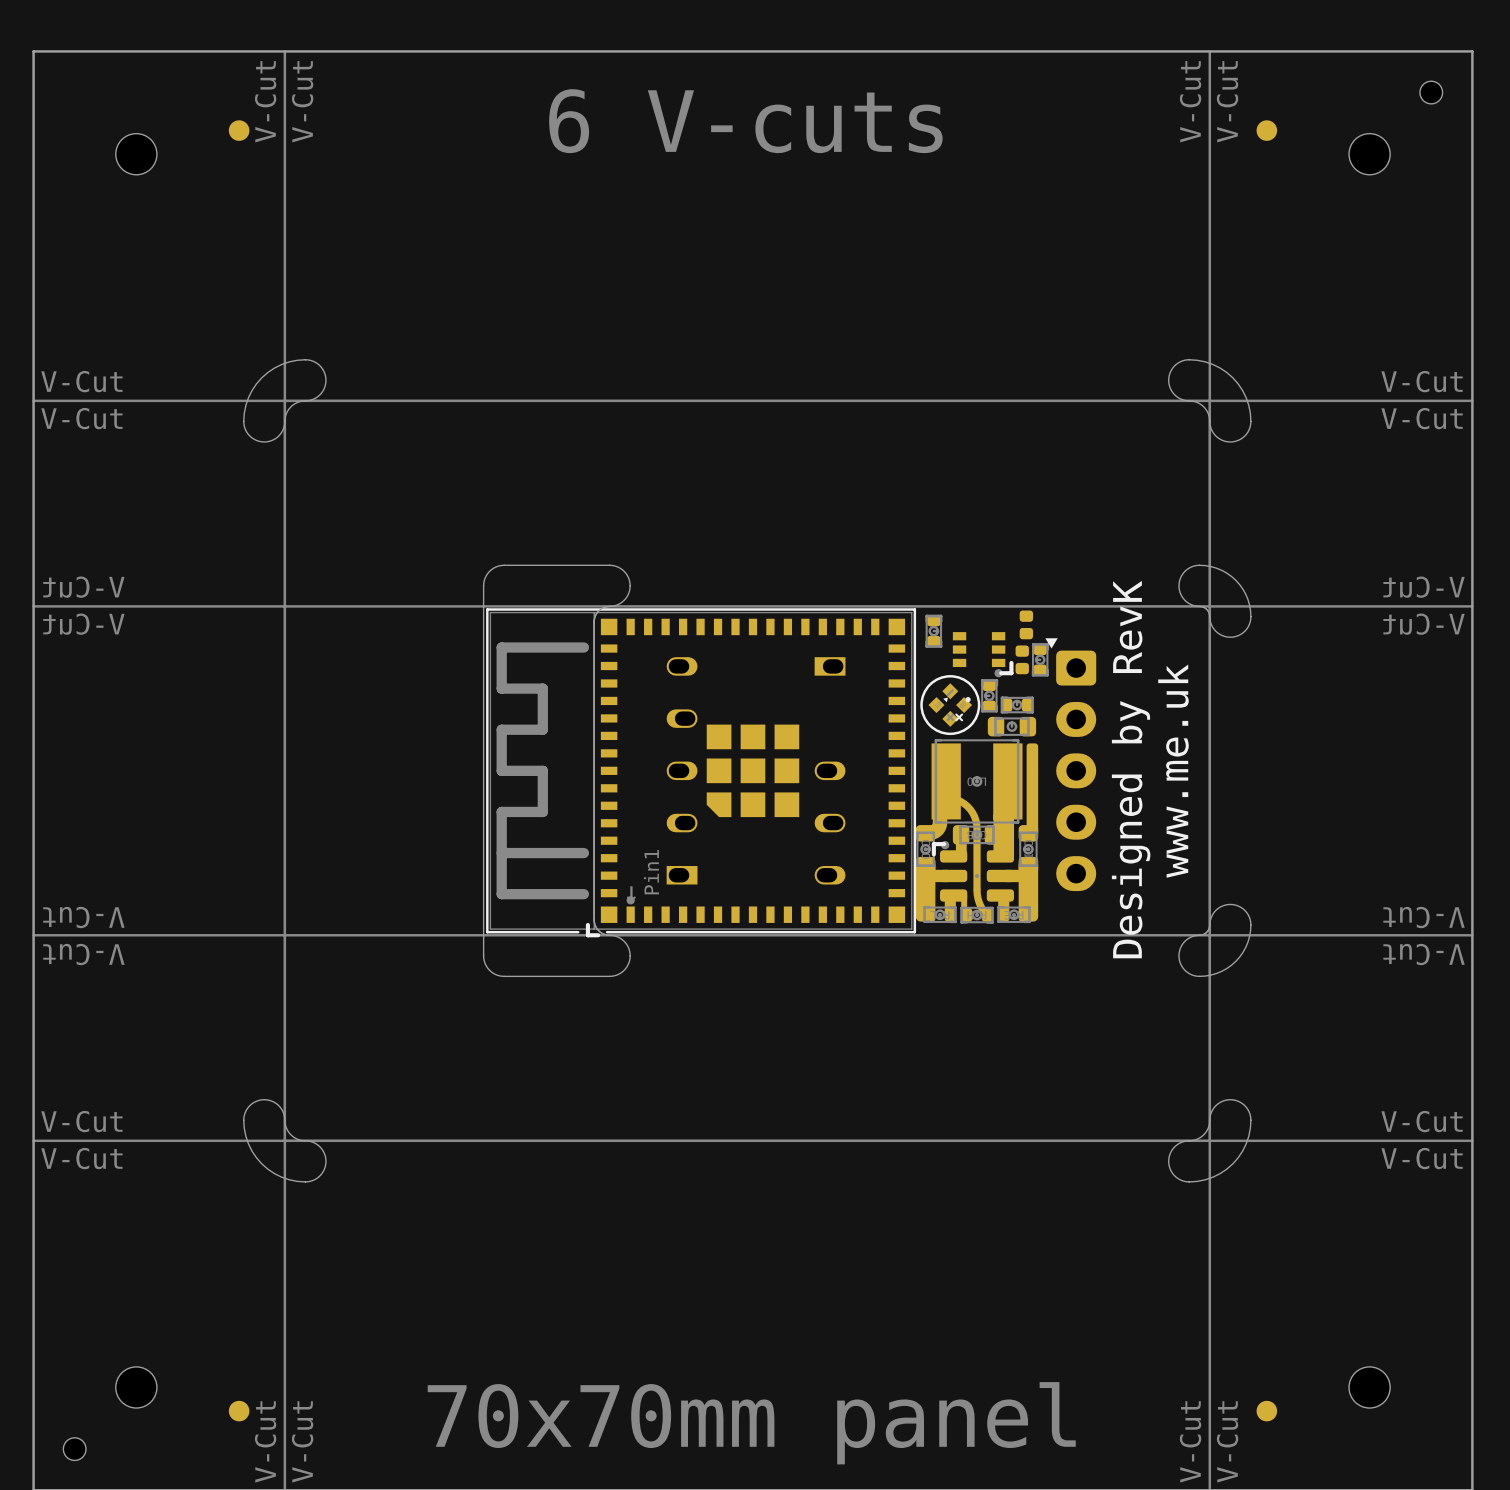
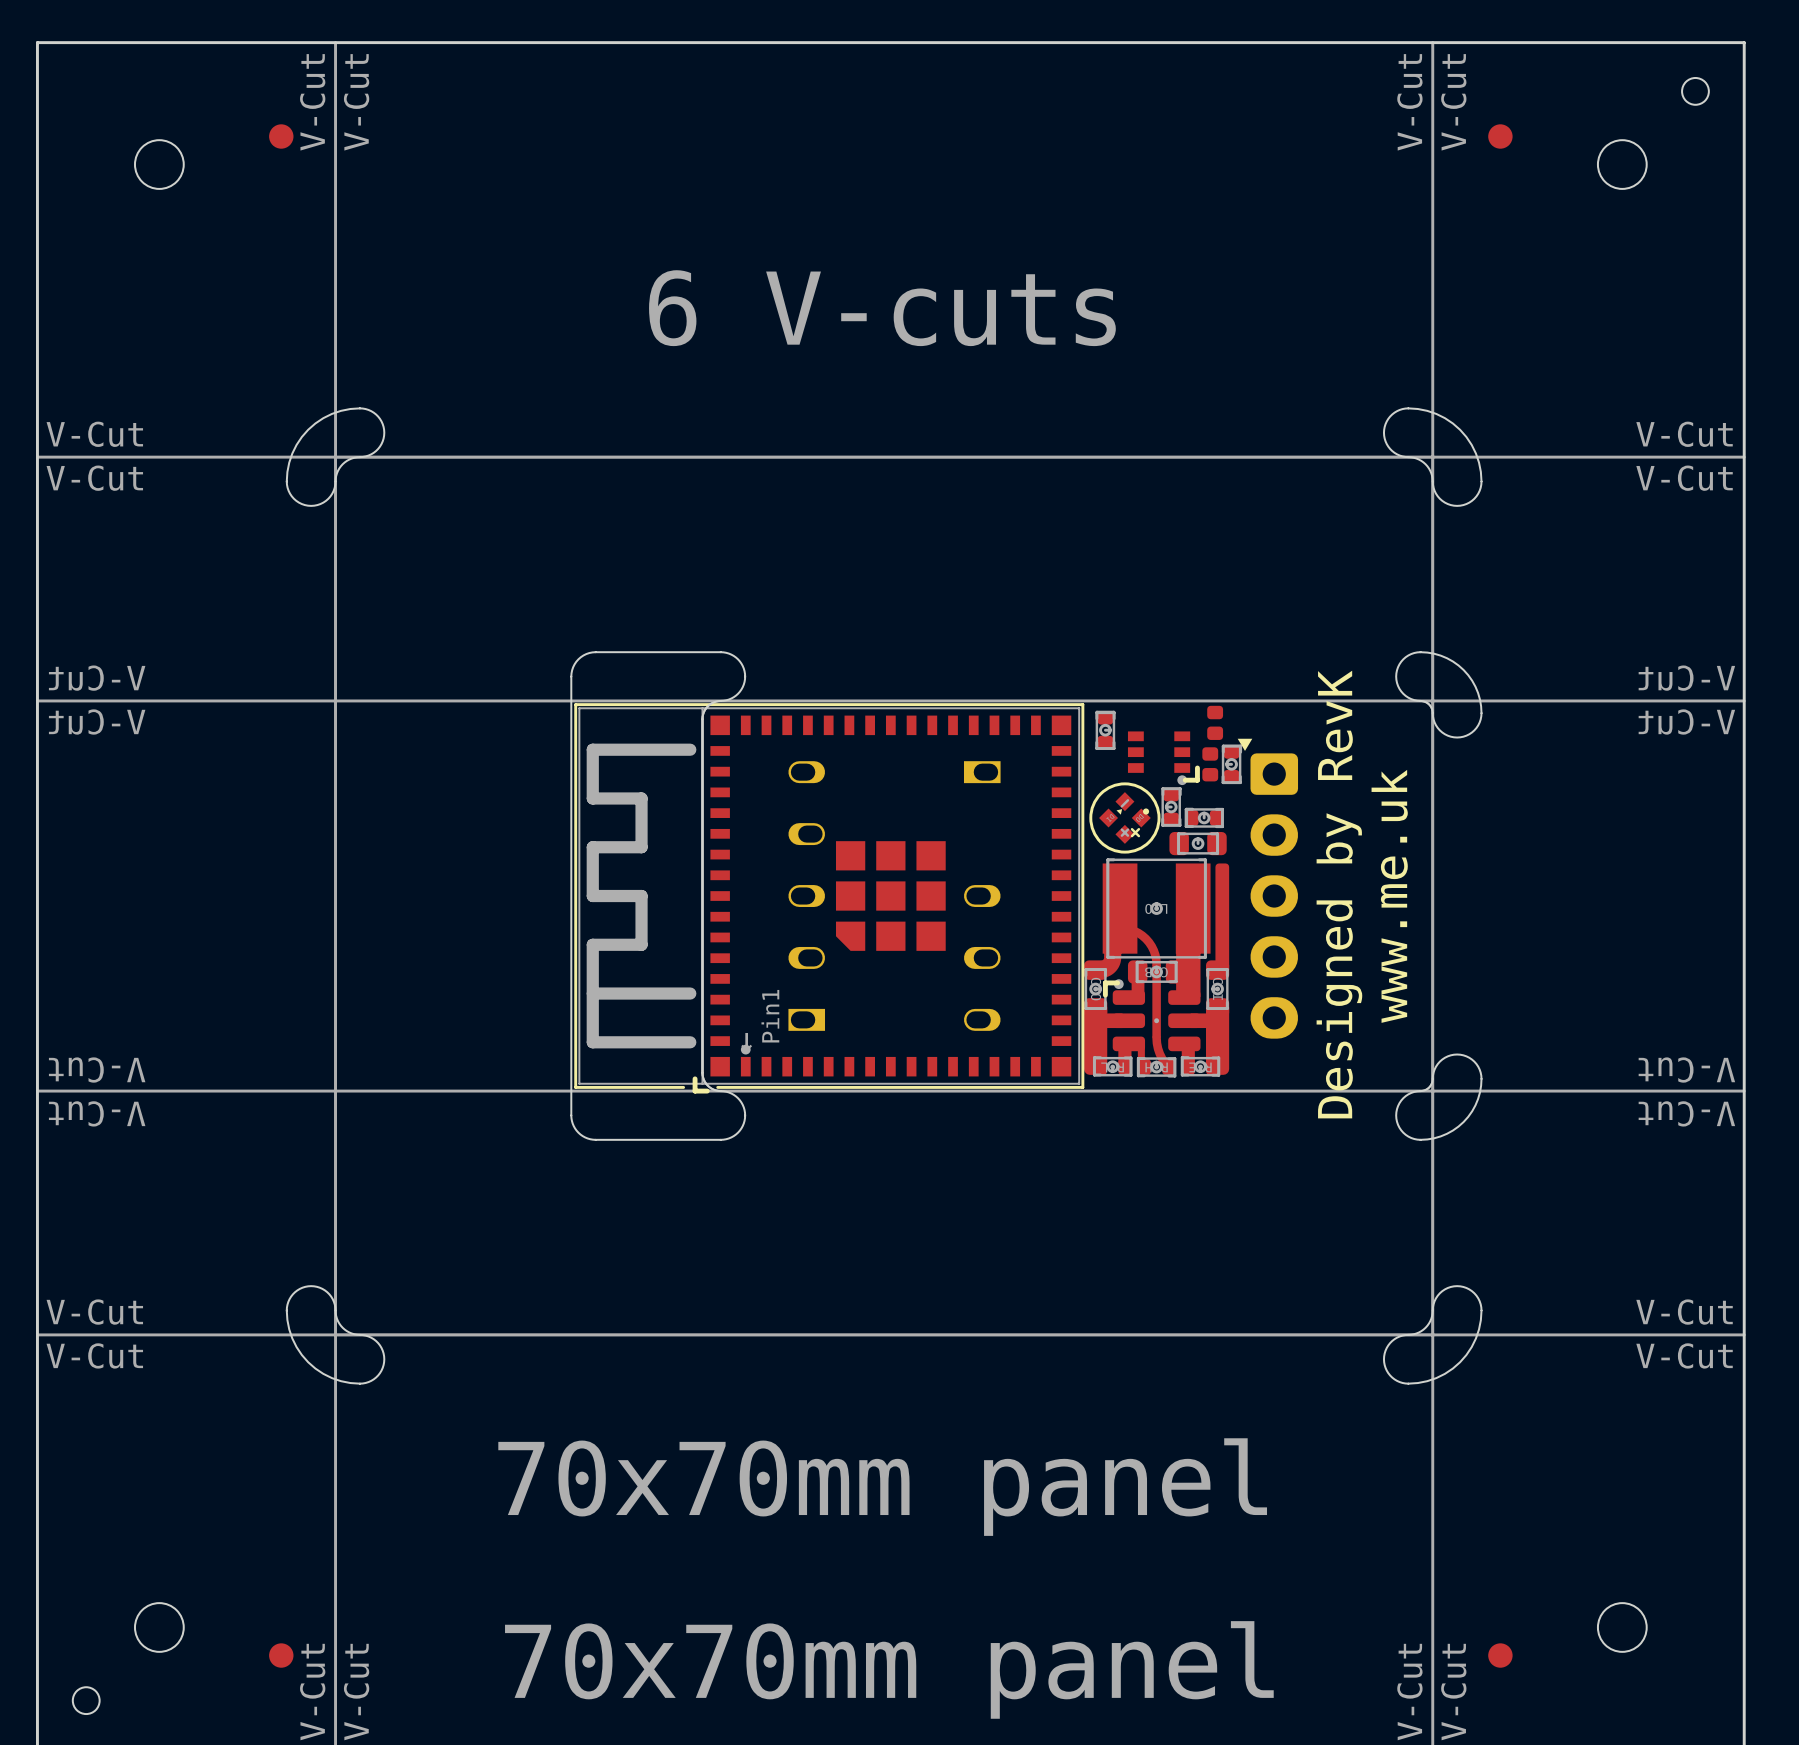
text position: 6 V-cuts (745, 121) -> 6 V-cuts (882, 308)
text: none -> 70x70mm panel (882, 1487)

